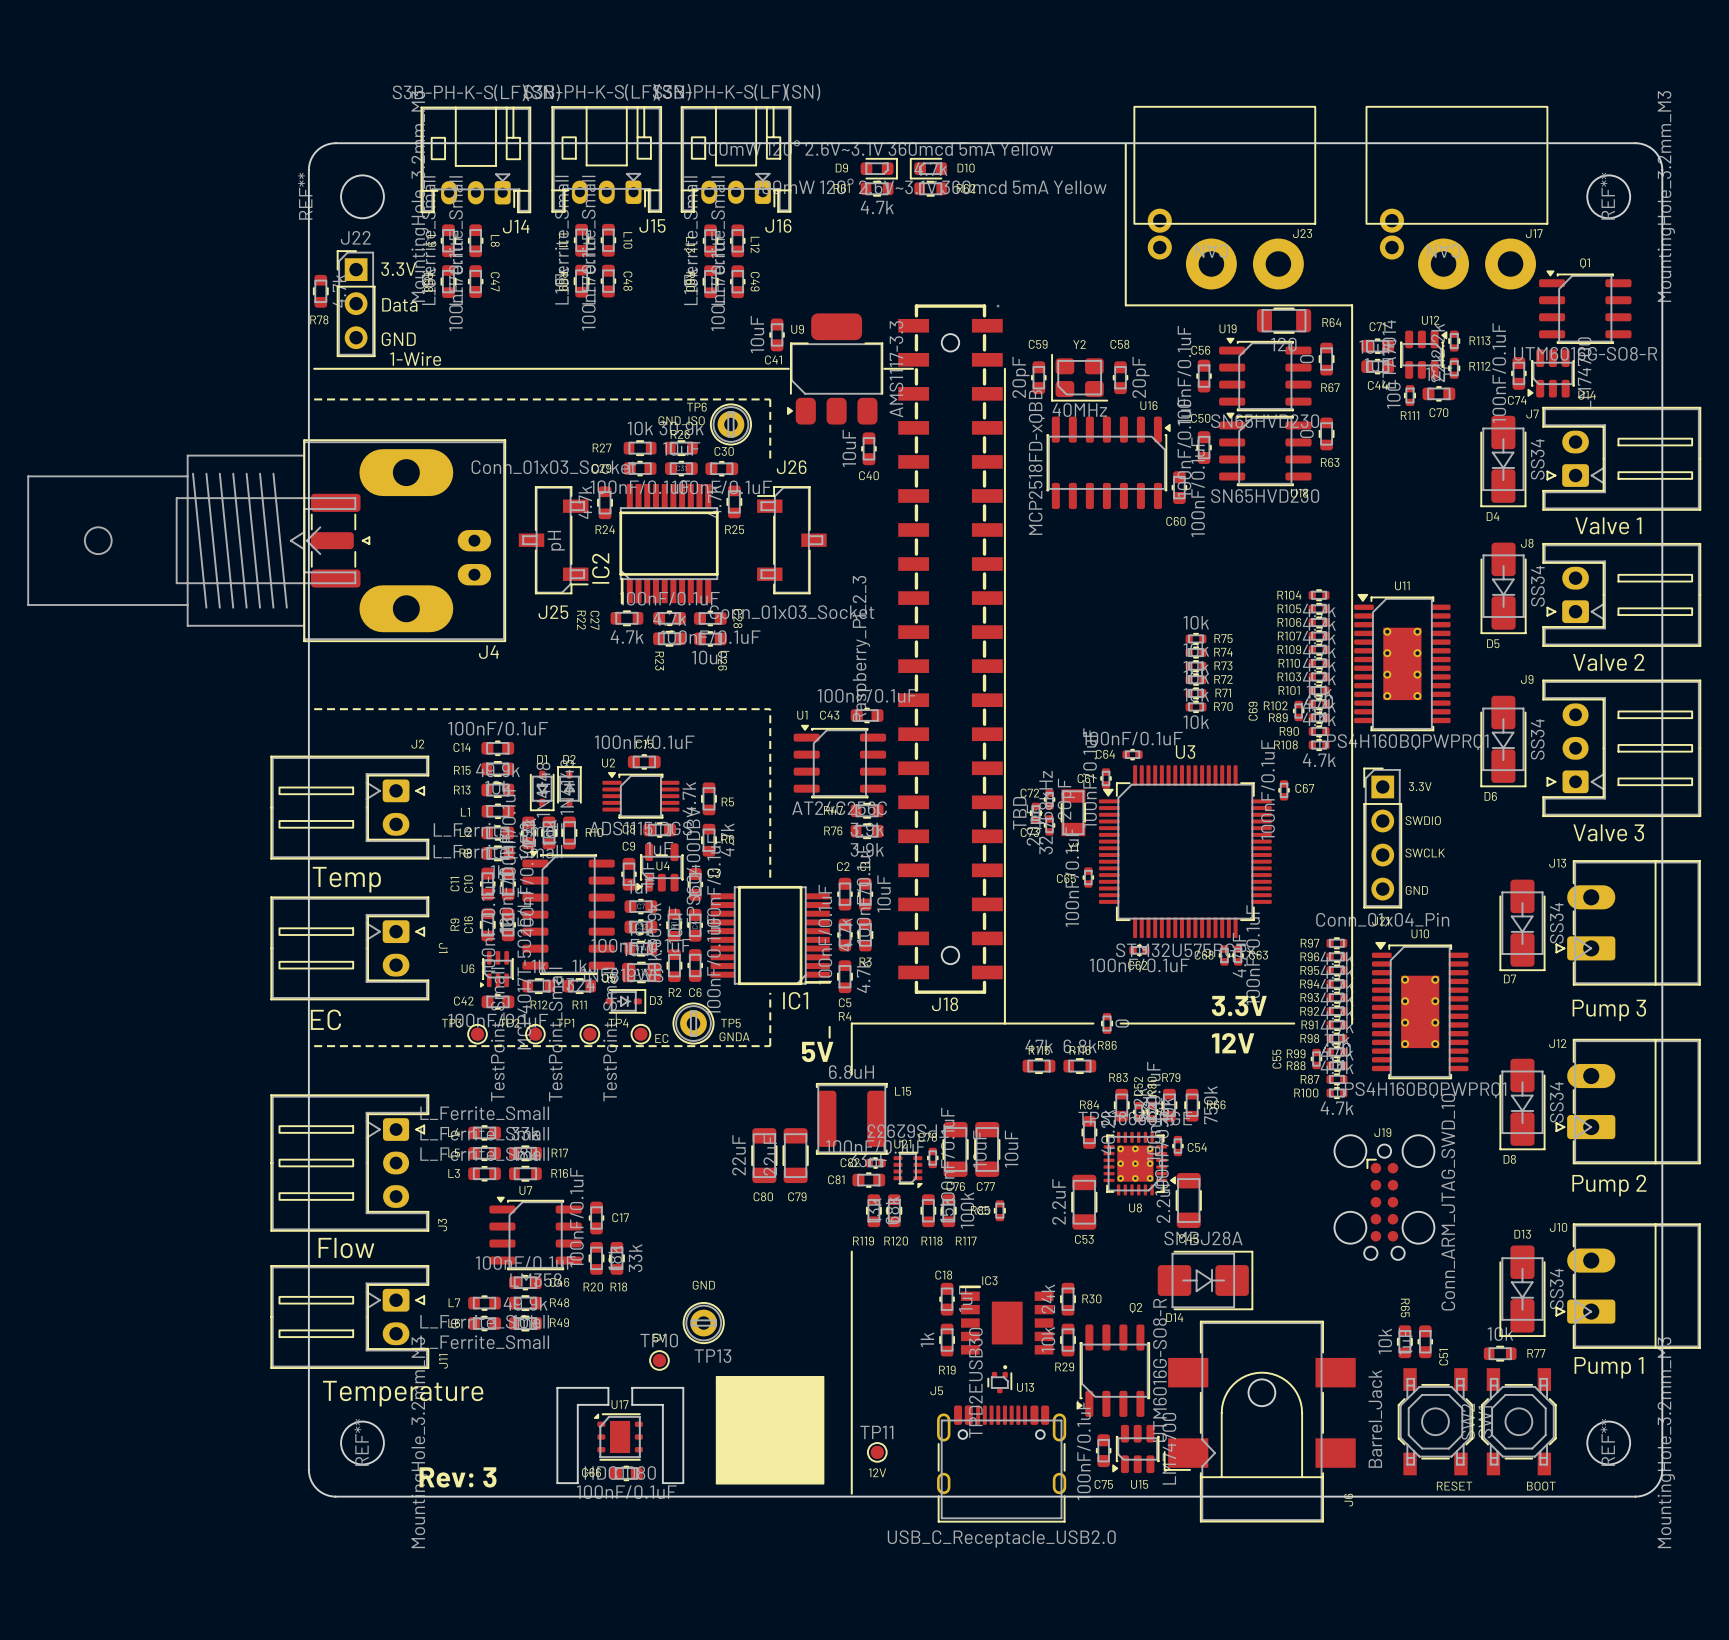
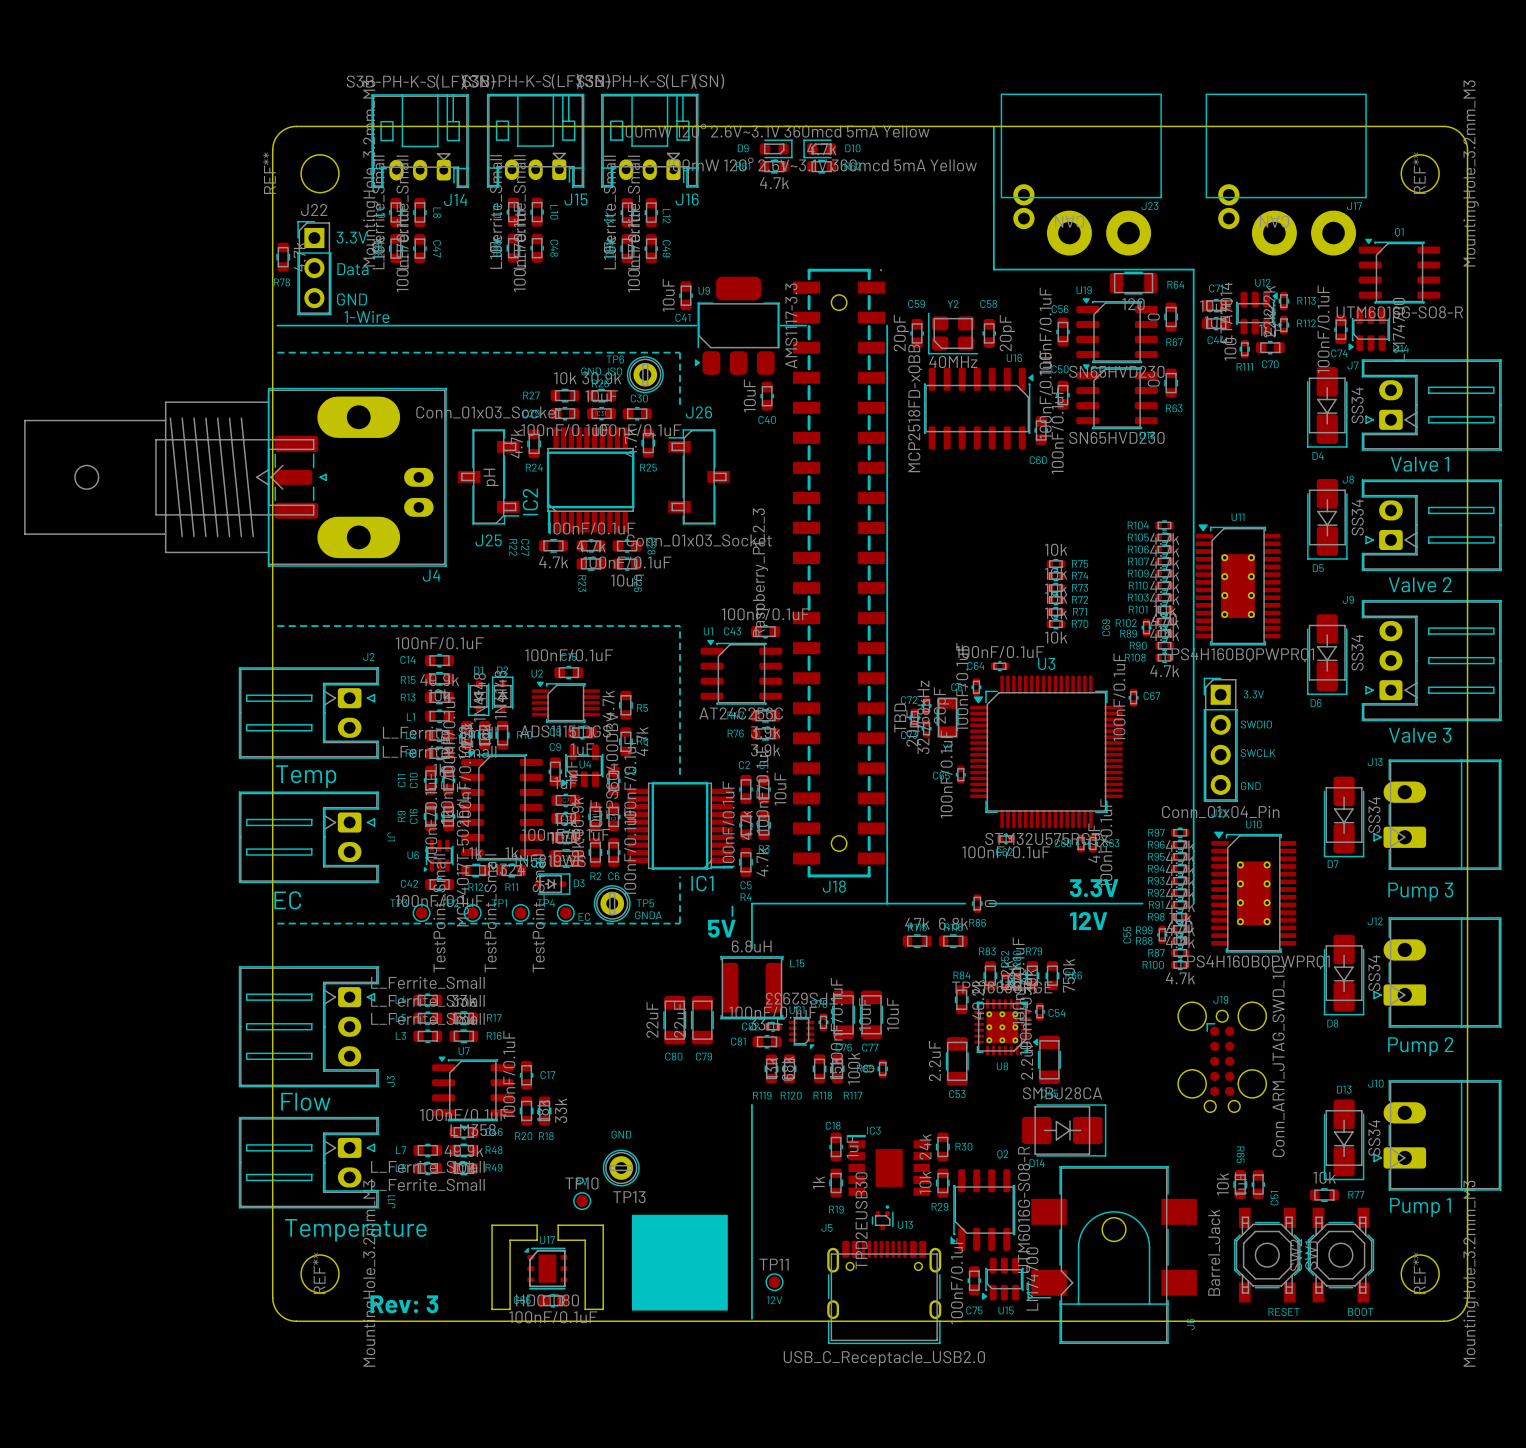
D14 value: SMBJ28A (1203, 1238) -> SMBJ28CA (1062, 1093)

